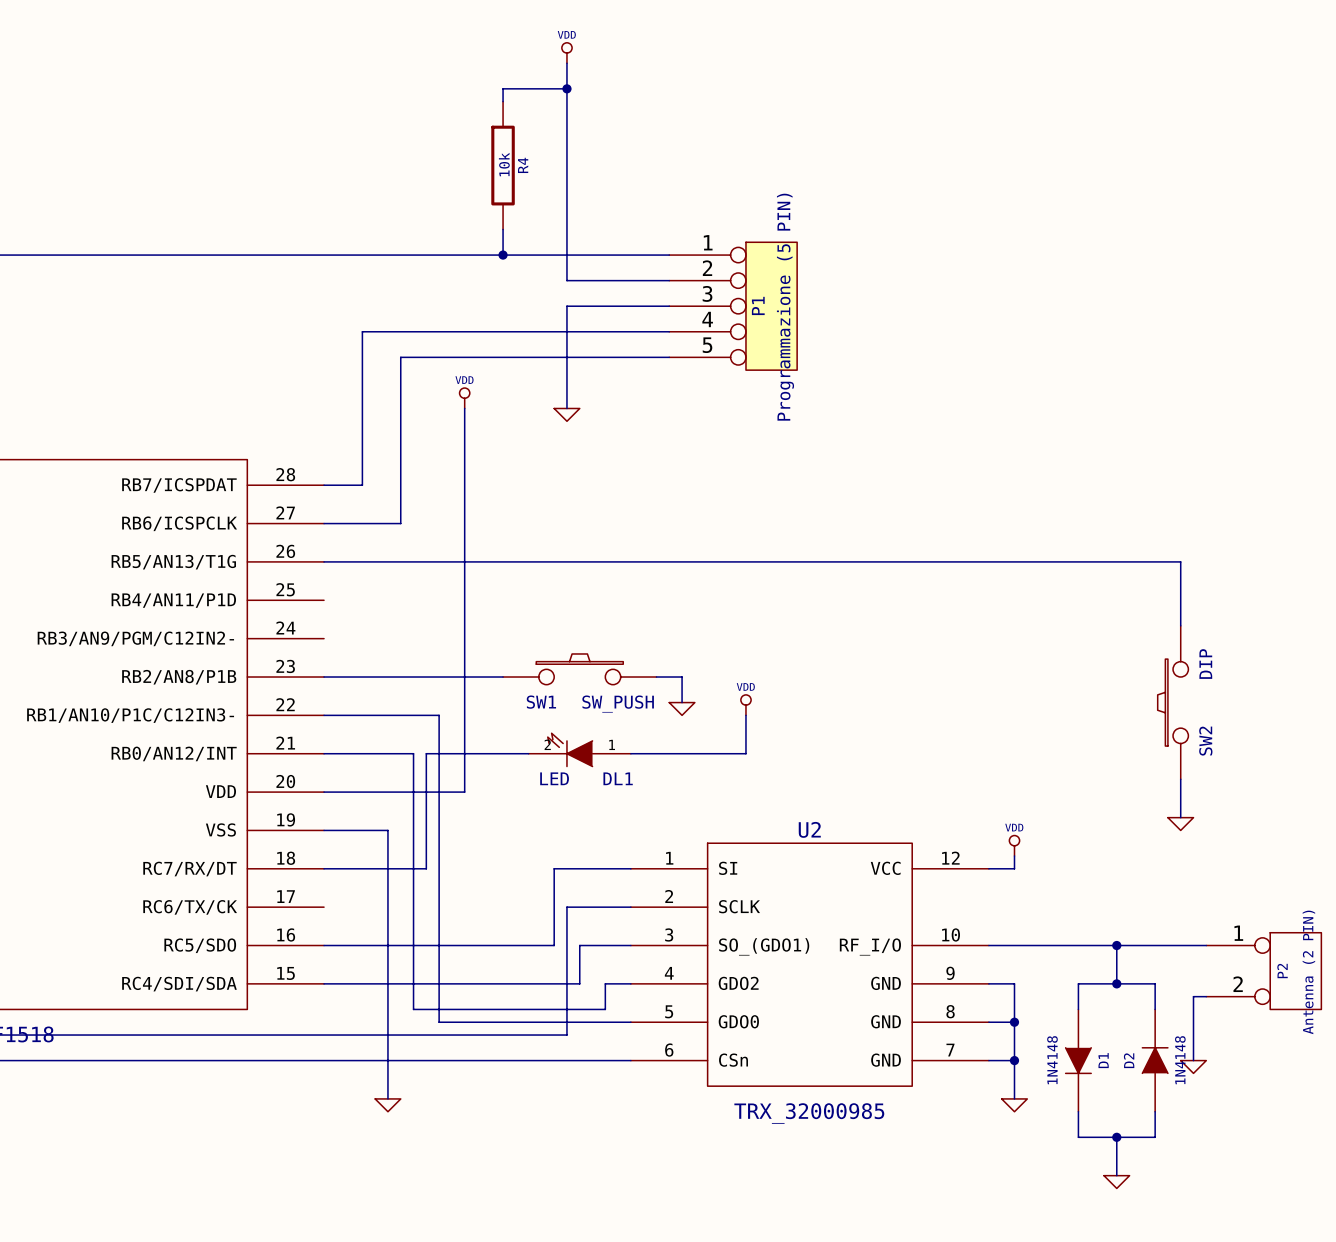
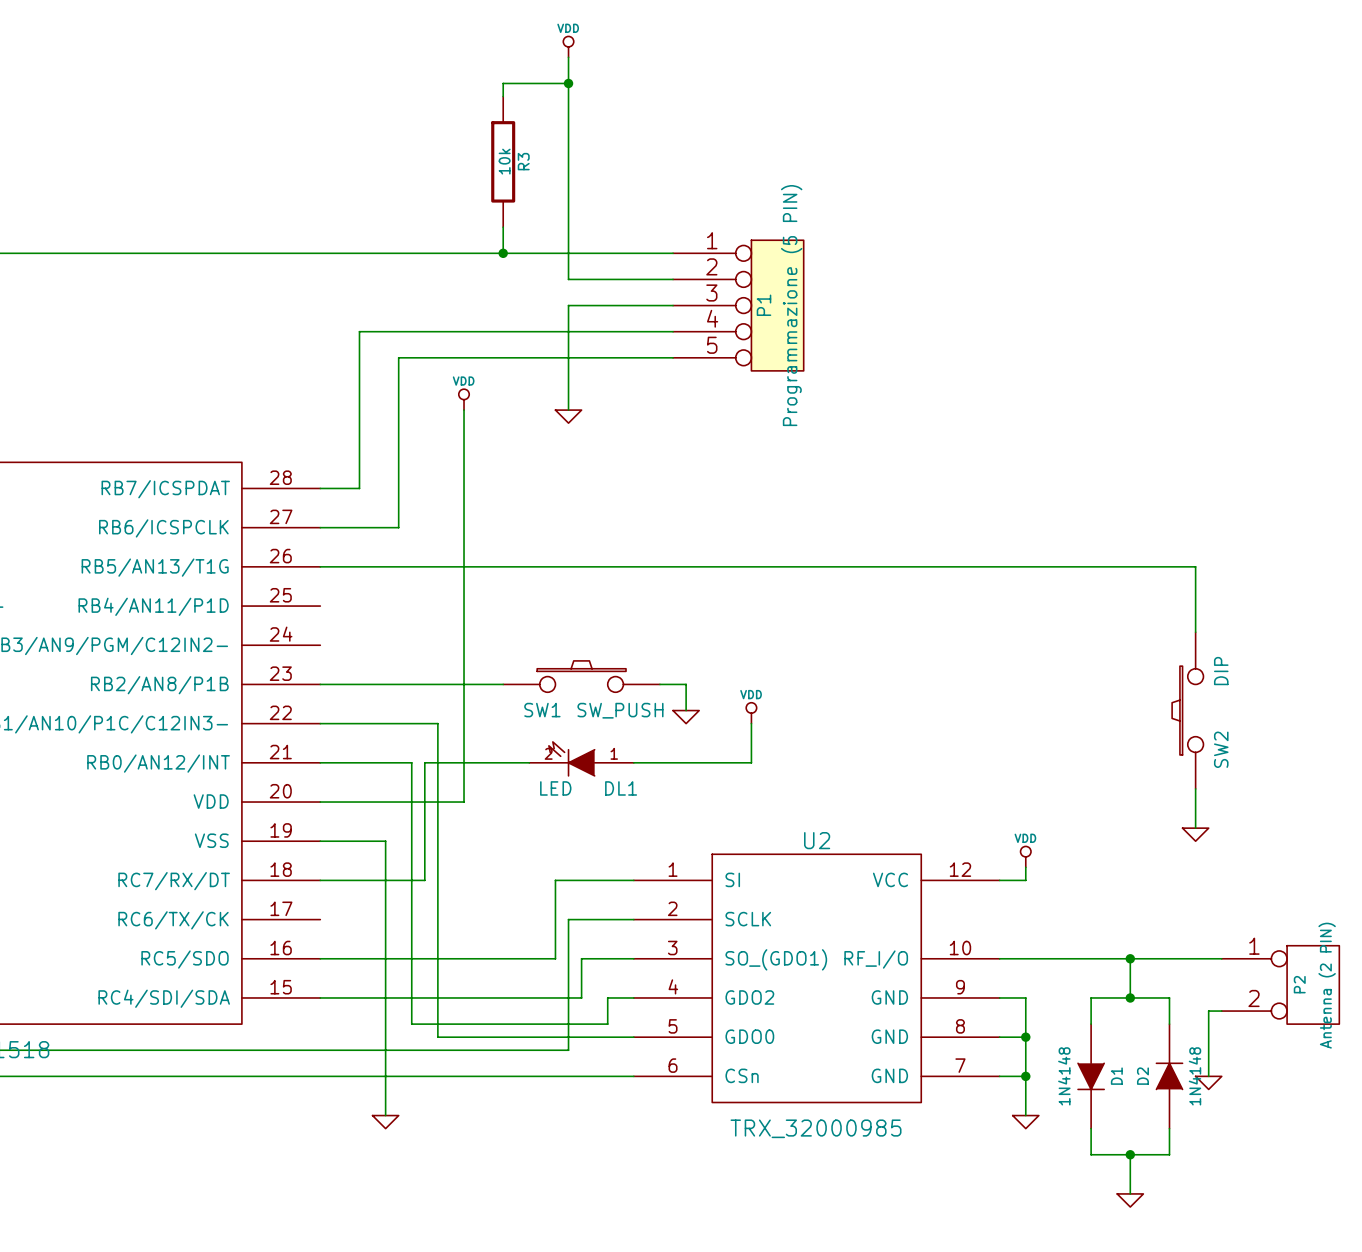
R4 name: R4 (523, 165) -> R3 (523, 161)

